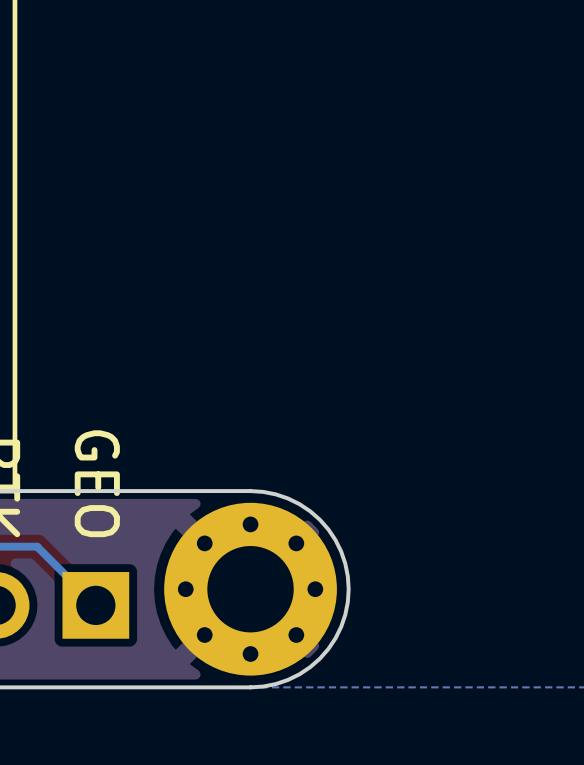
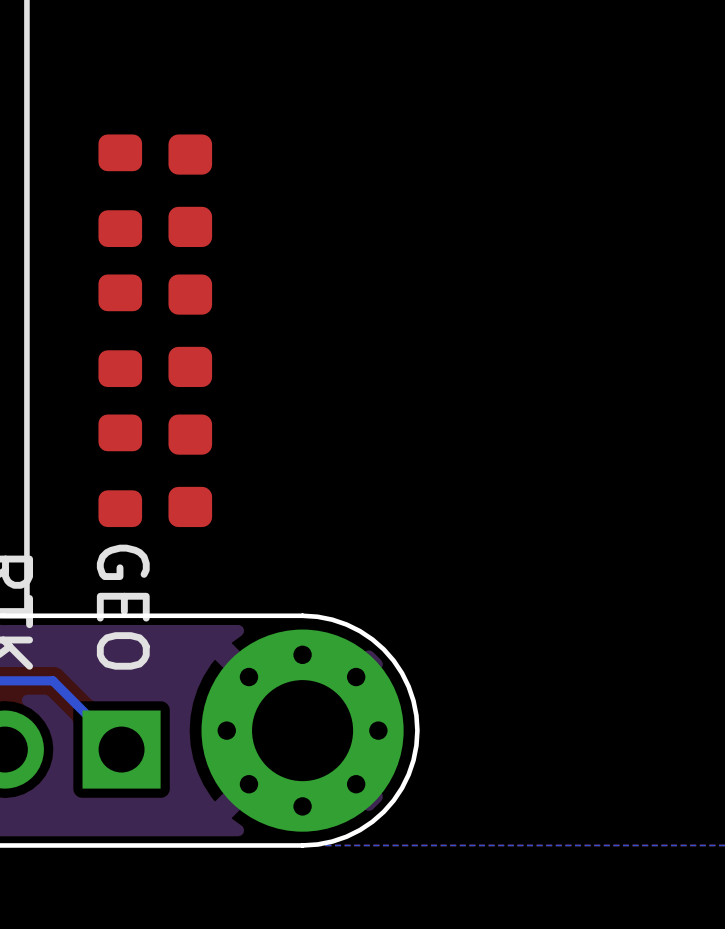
part: none -> (120, 190)
part: none -> (190, 190)
part: none -> (120, 330)
part: none -> (190, 330)
part: none -> (120, 470)
part: none -> (190, 470)

